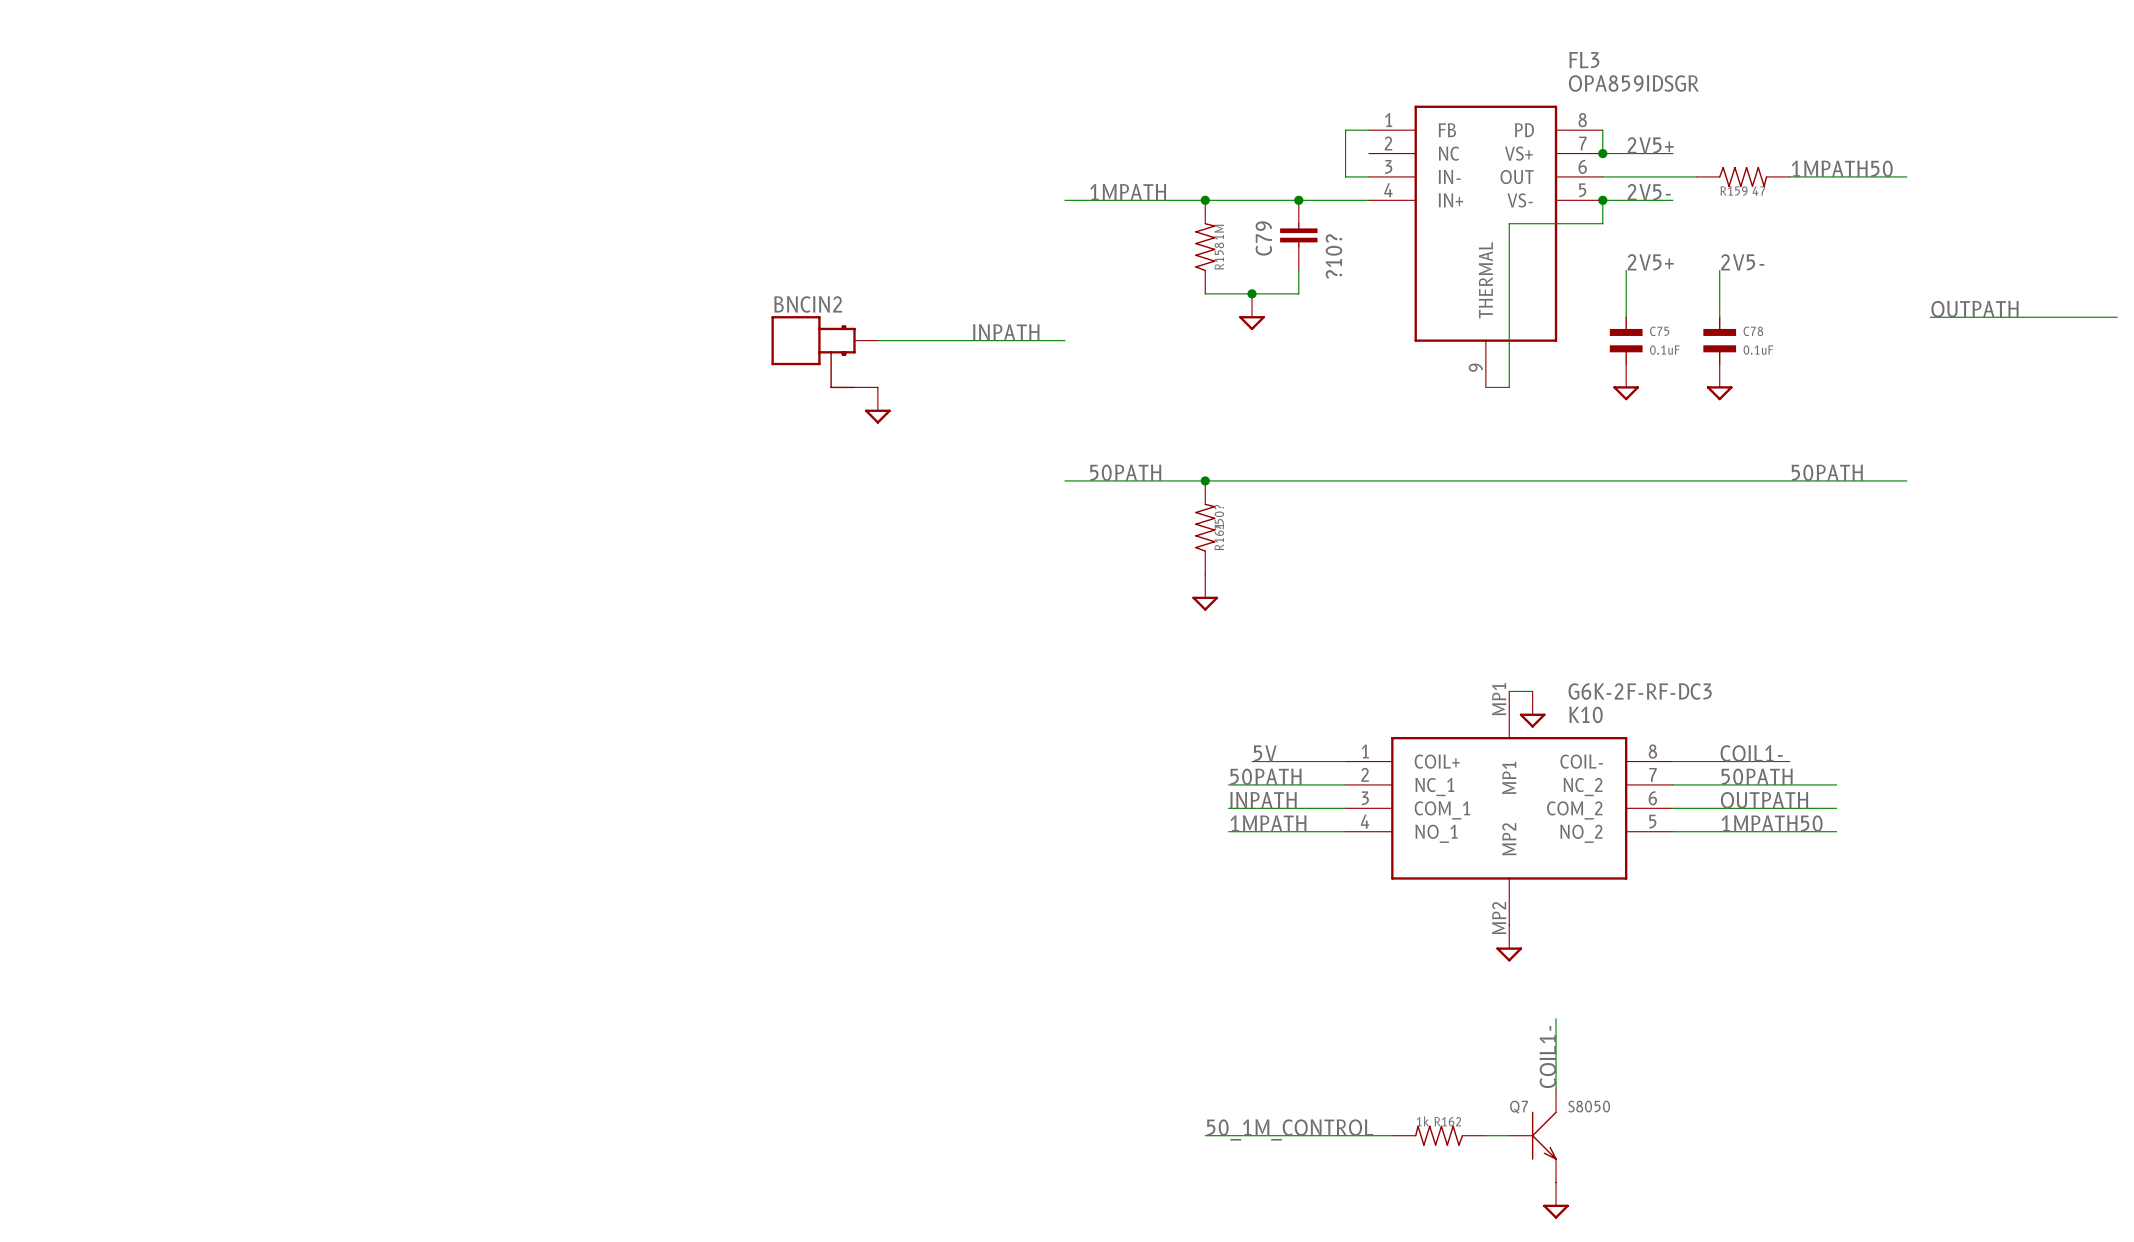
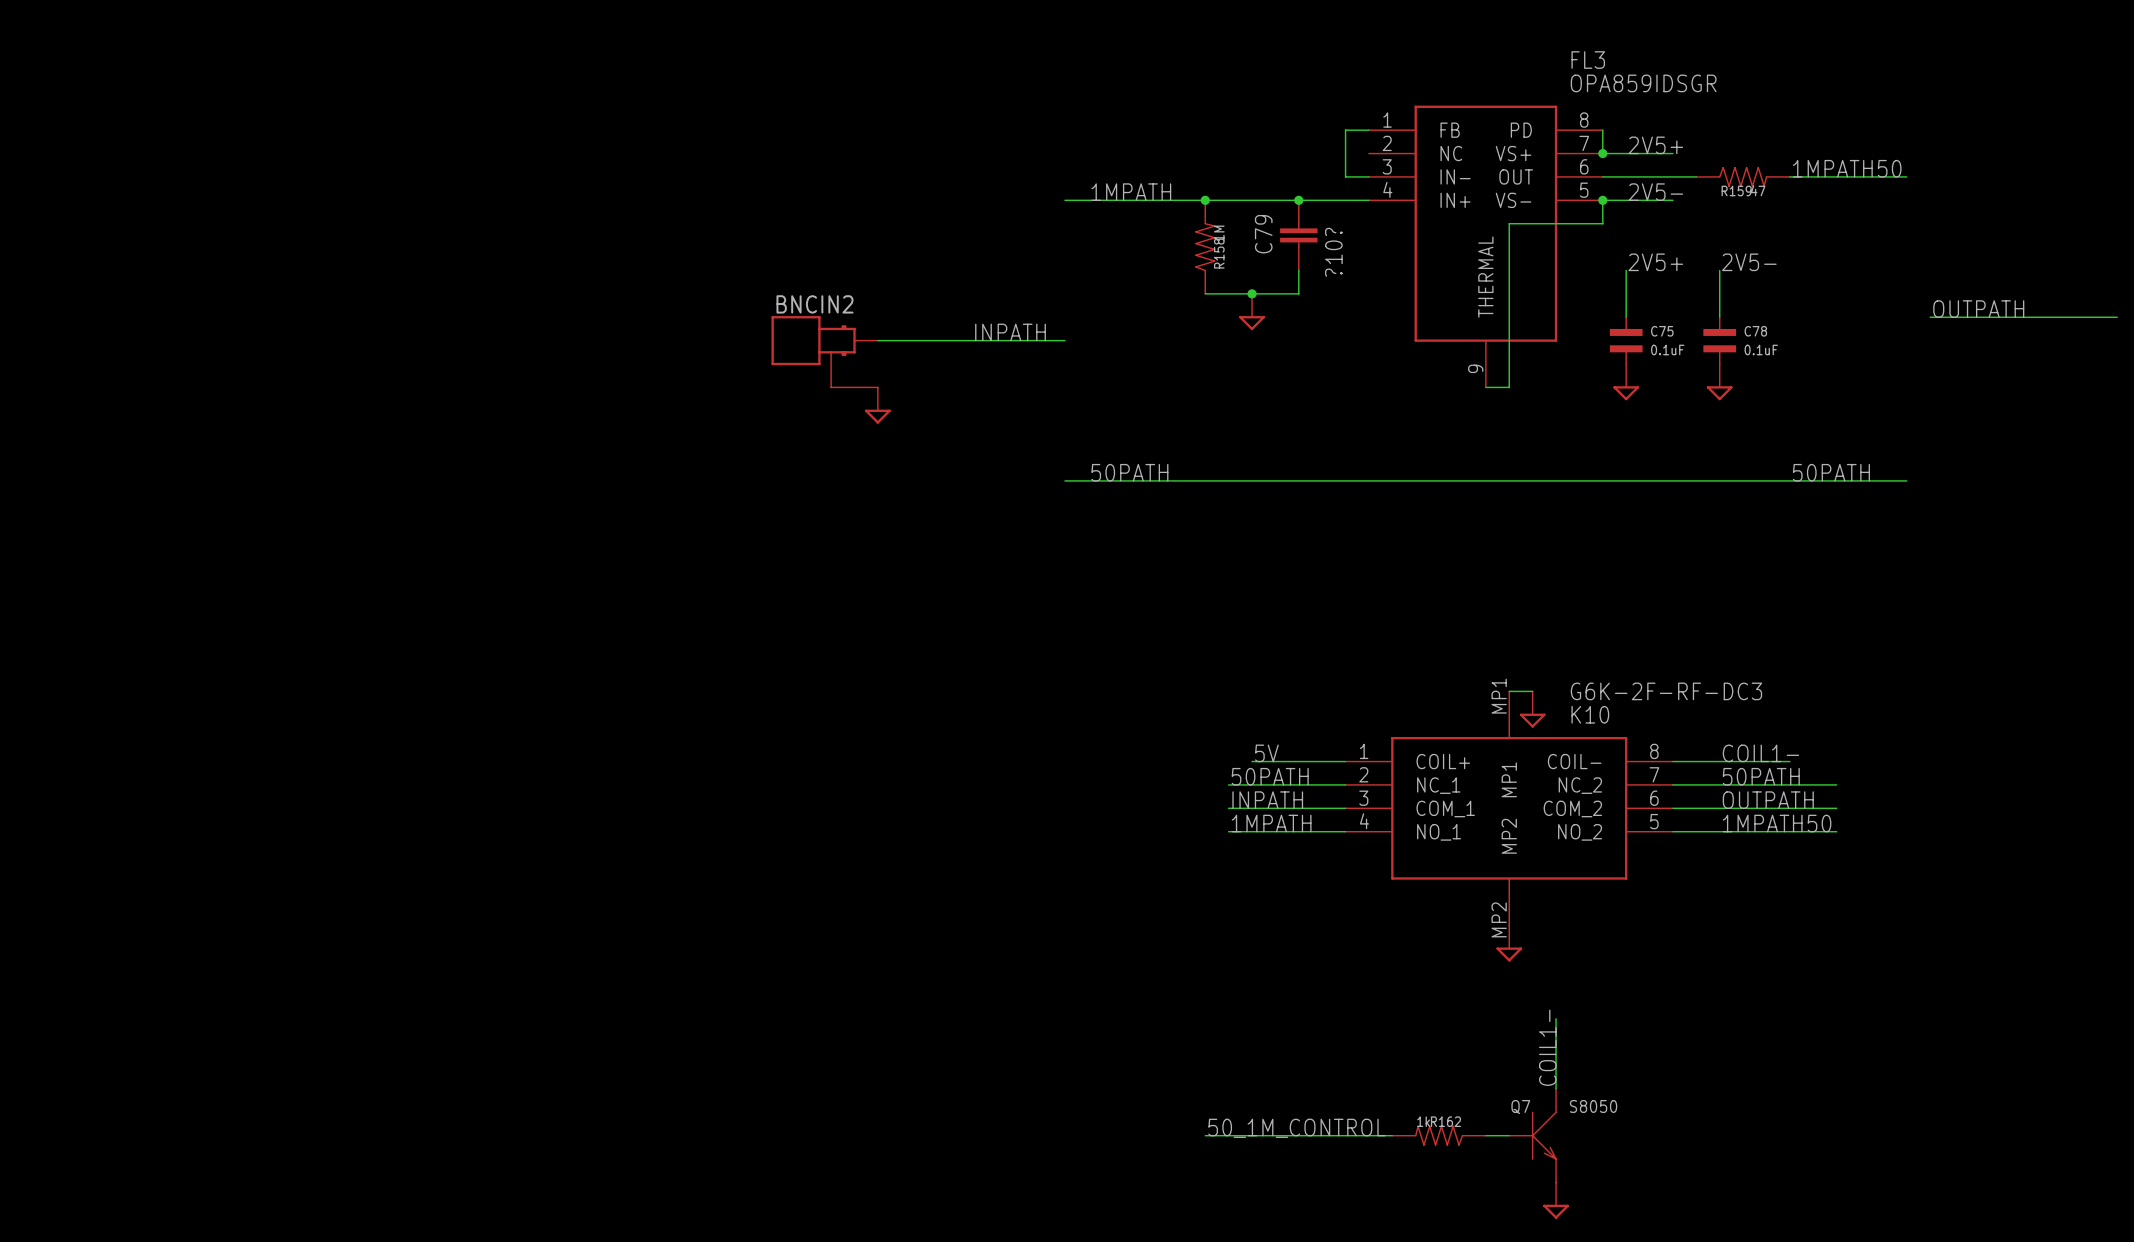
junction: (1205, 480) -> none
R161: ?50? (1205, 527) -> none
power symbol: (1205, 592) -> none

